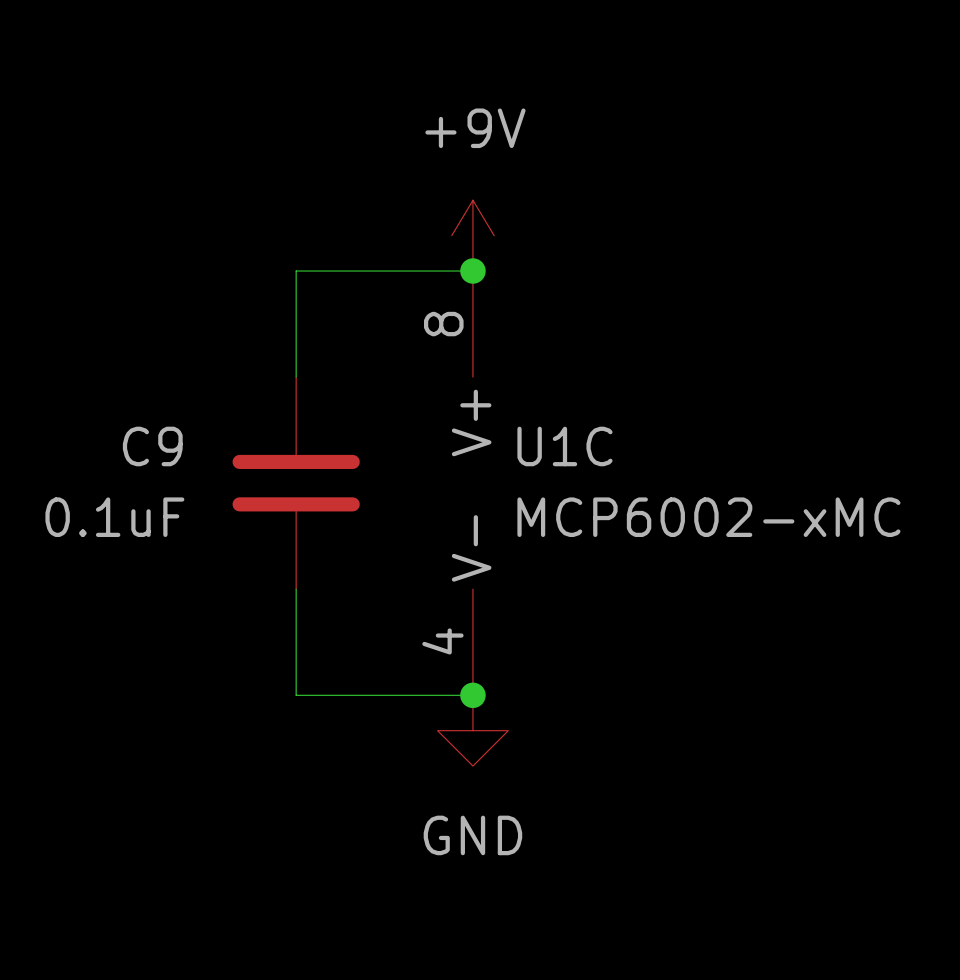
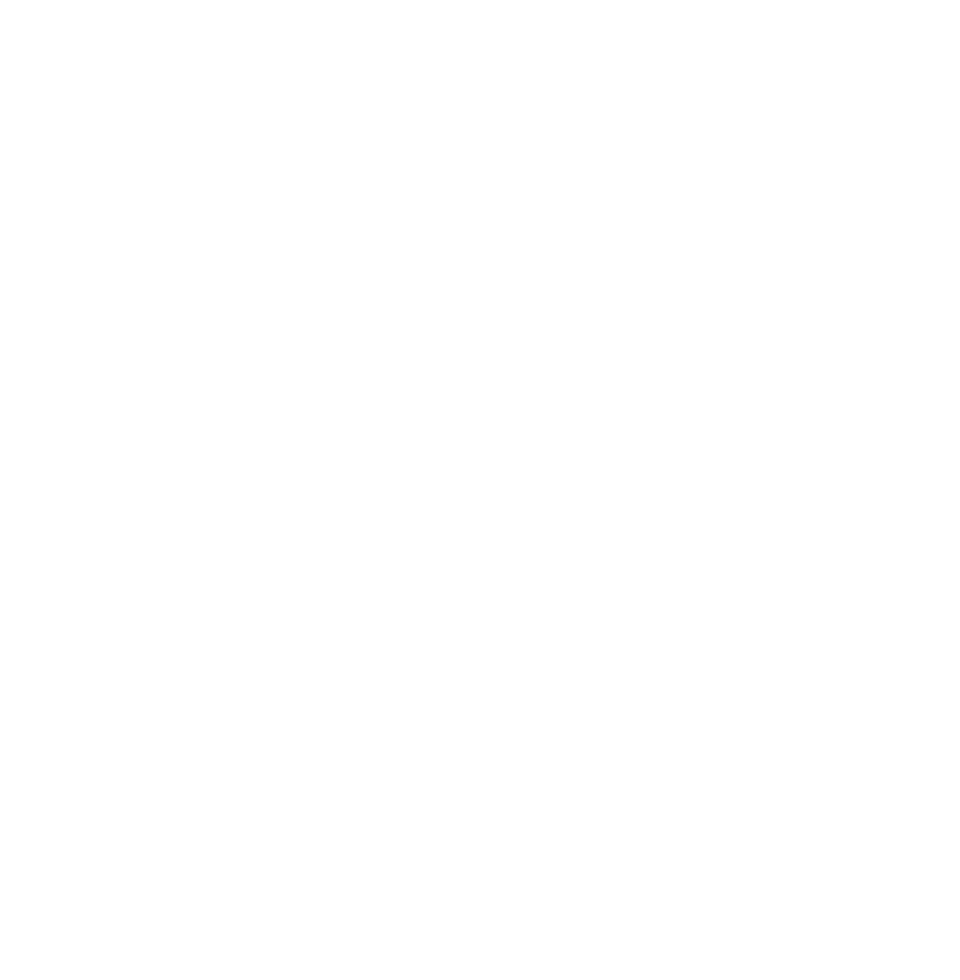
power symbol: +9V (472, 235) -> none
wire: (472, 271) (296, 271) (296, 377) -> none
junction: (472, 271) -> none
C9: 0.1uF (296, 483) -> none
U1C: MCP6002-xMC (472, 483) -> none
wire: (296, 589) (296, 695) (472, 695) -> none
junction: (472, 695) -> none
power symbol: GND (472, 730) -> none

